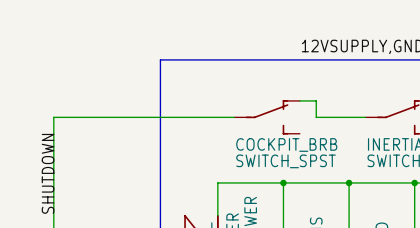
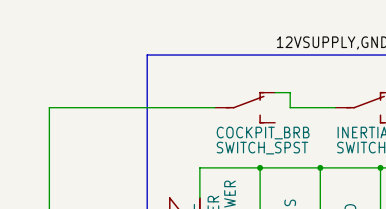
label: SHUTDOWN (48, 173) -> none

